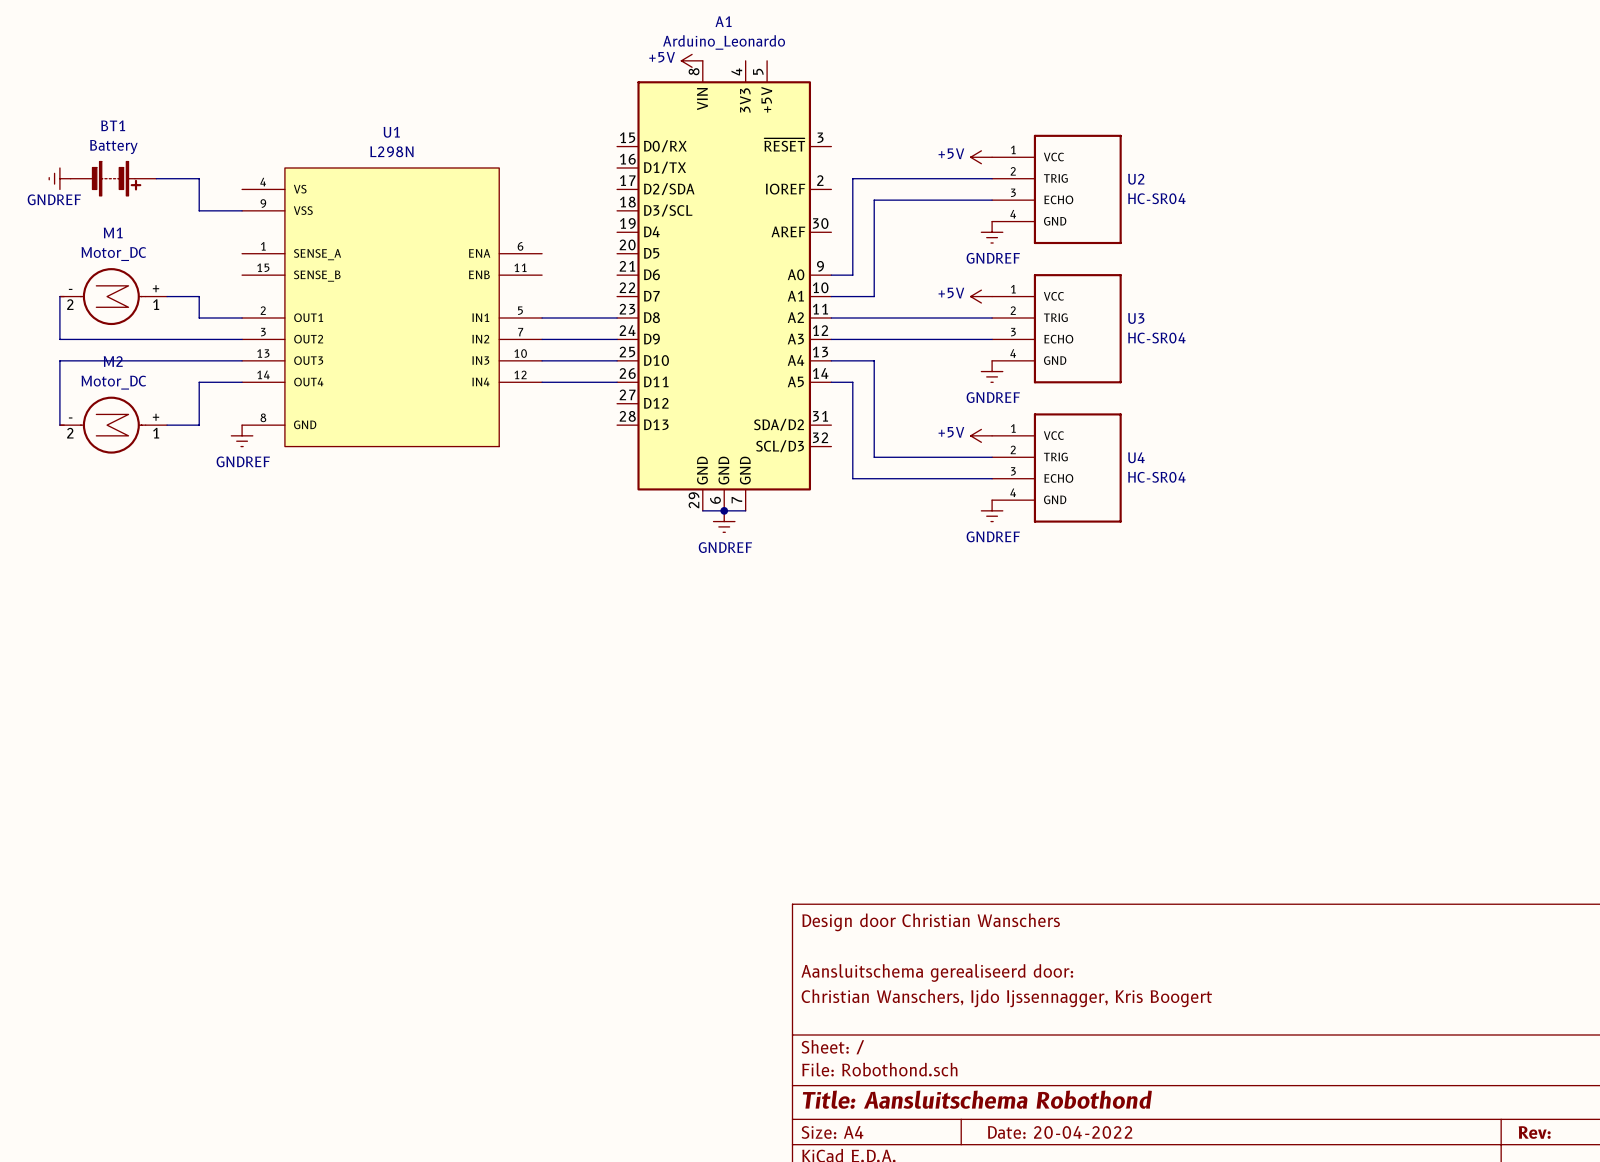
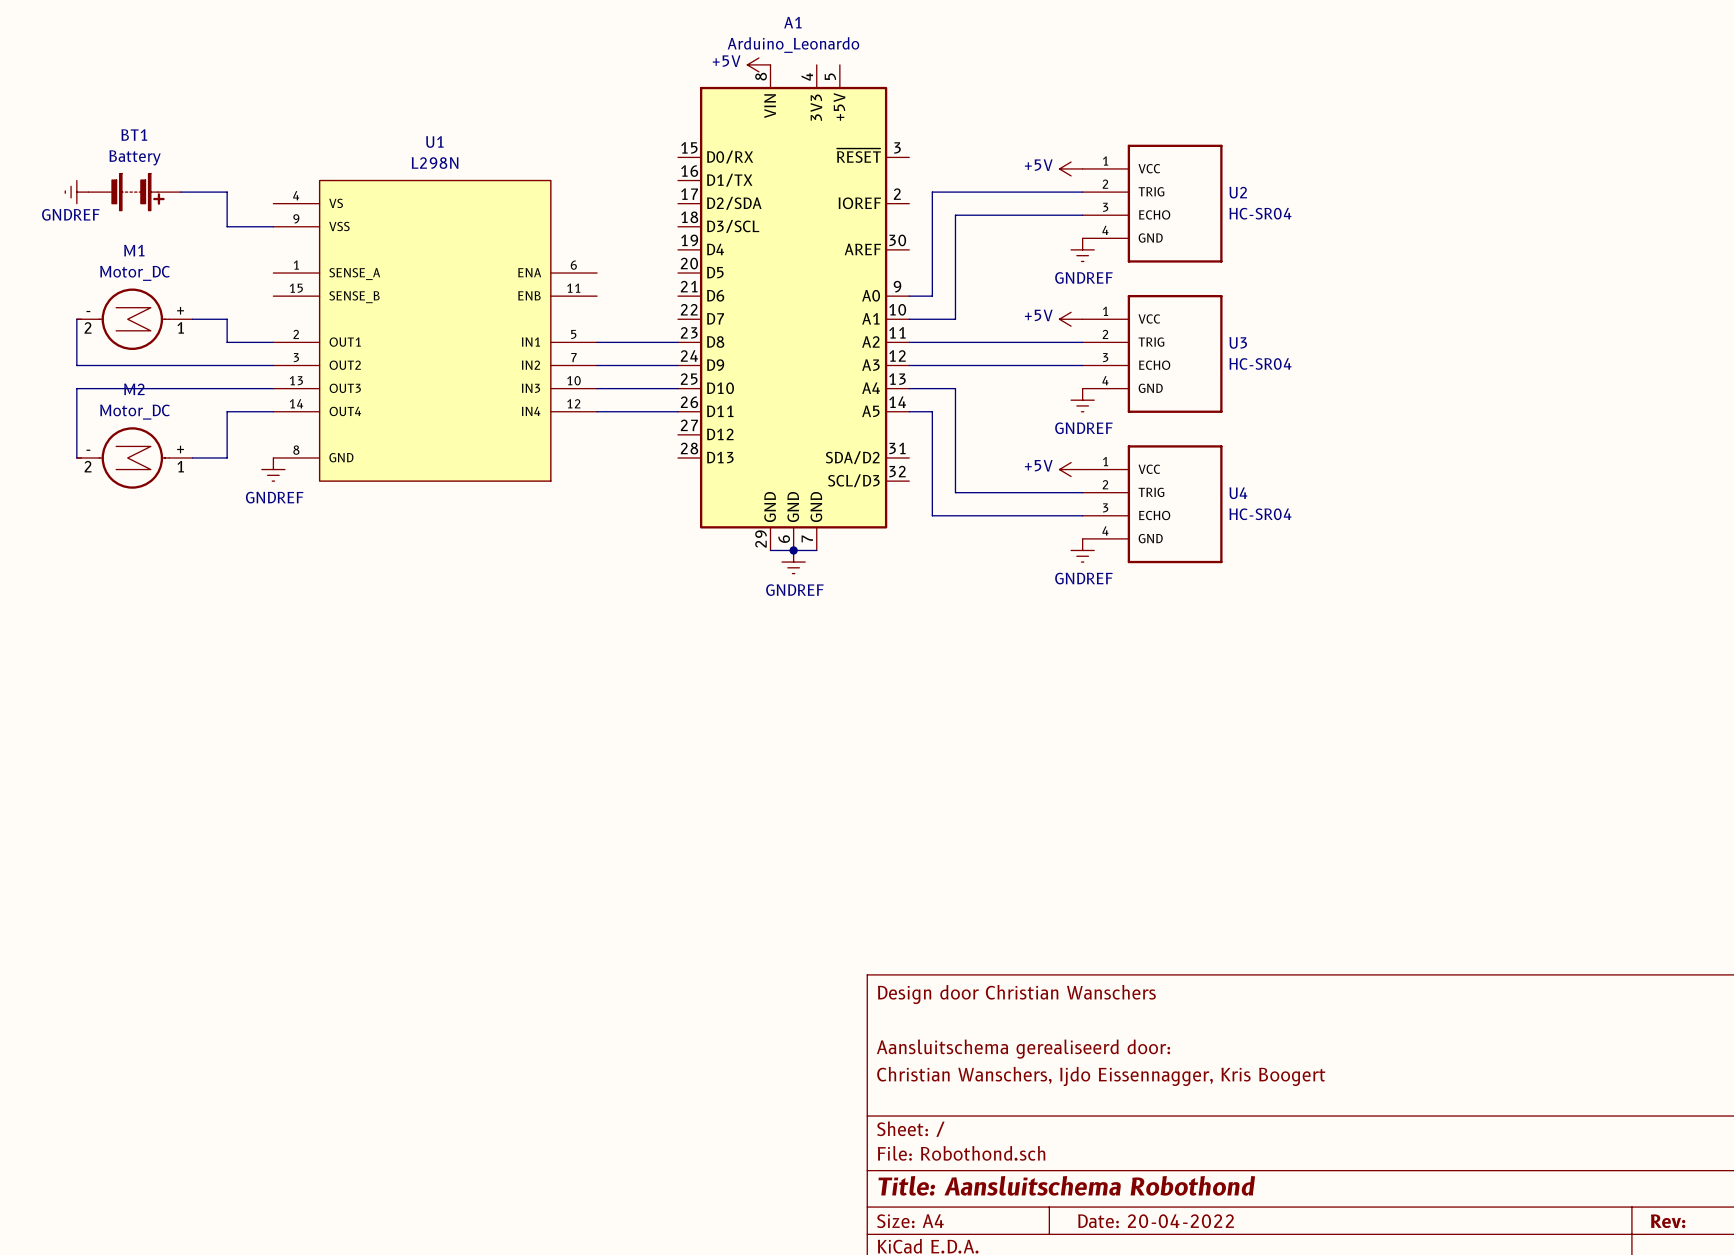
title block: Christian Wanschers, Ijdo Ijssennagger, Kris Boogert (1006, 998) -> Christian Wanschers, Ijdo Eissennagger, Kris Boogert (1101, 1076)

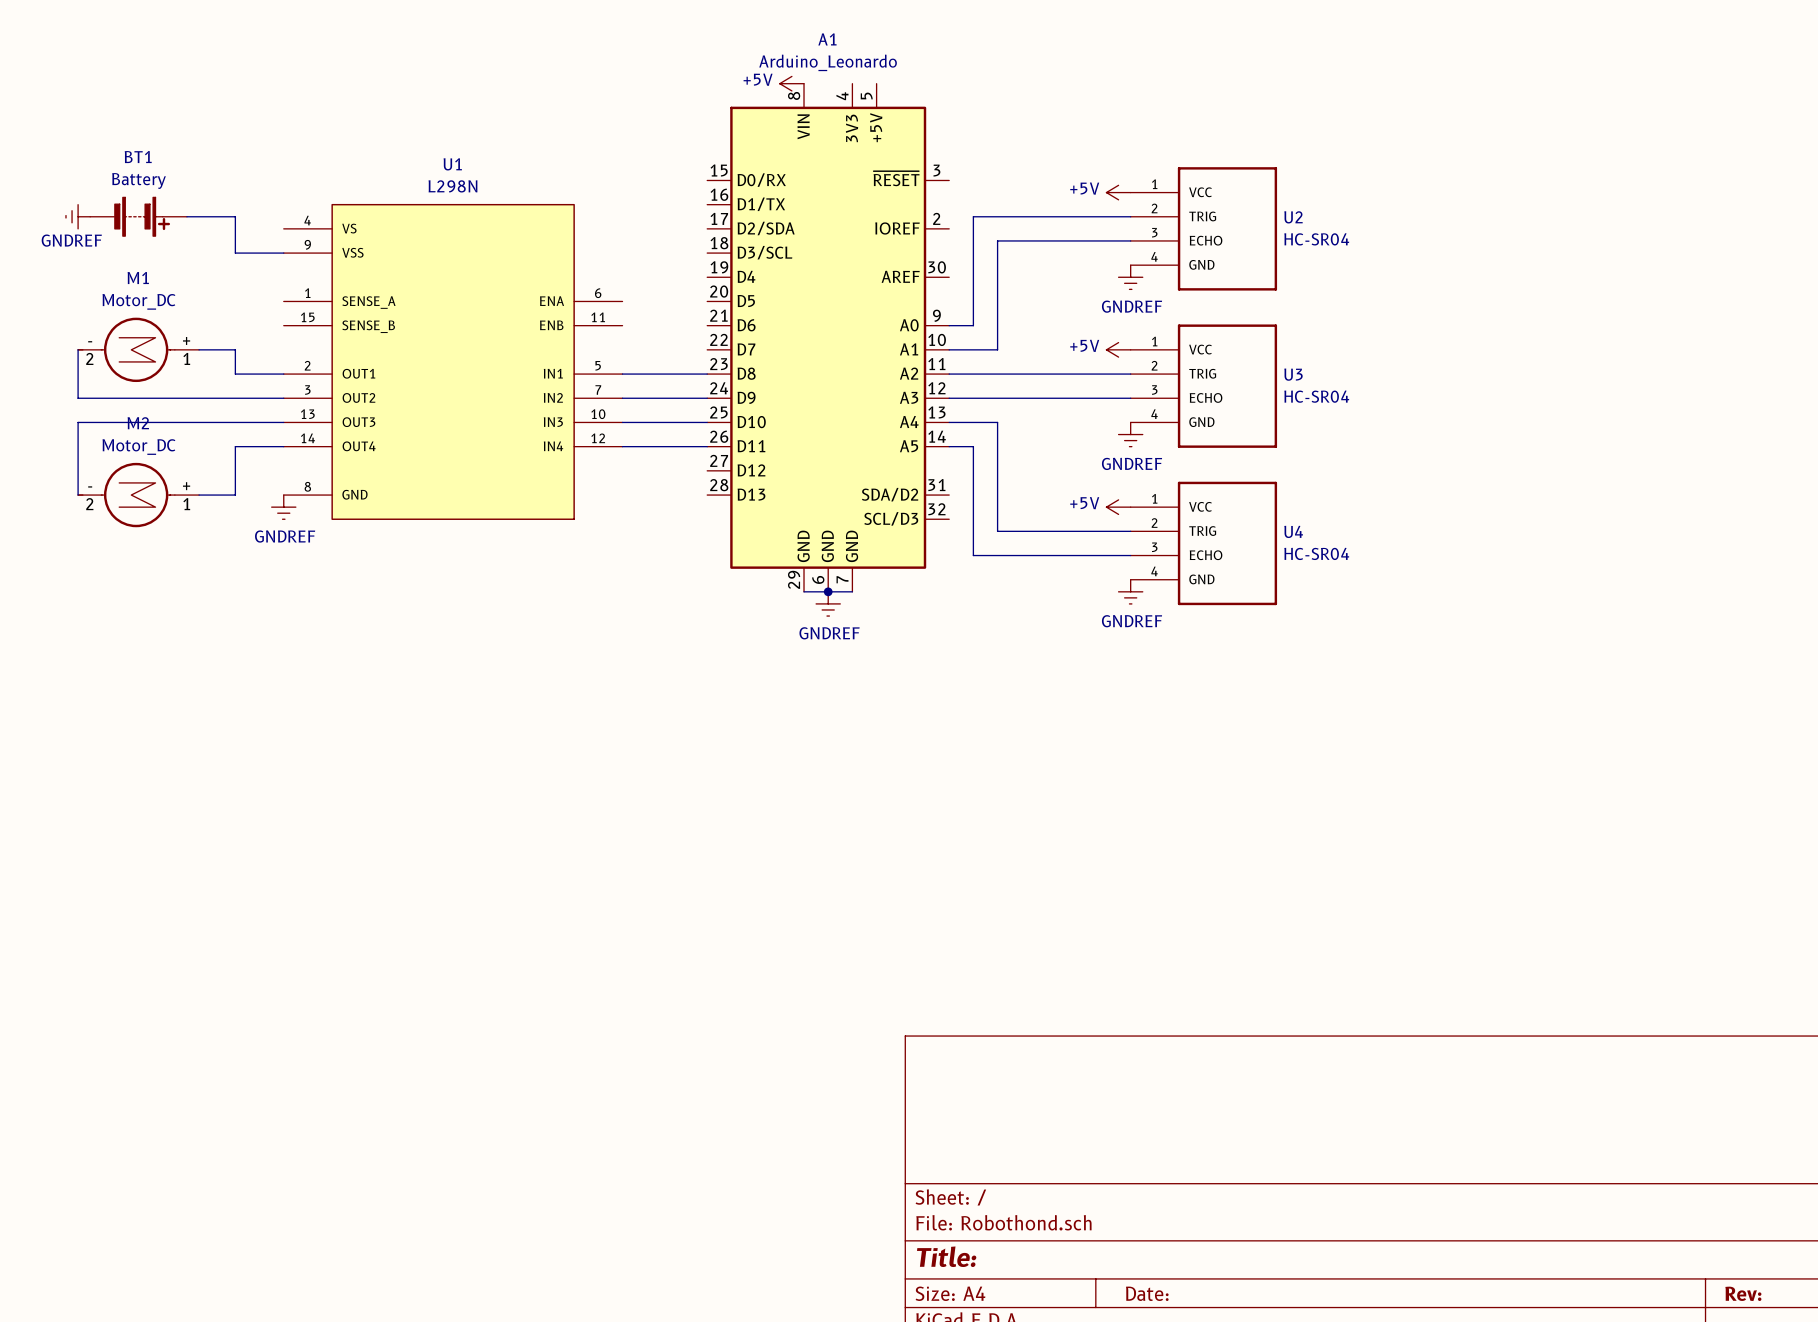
title block: Design door Christian Wanschers (1016, 994) -> none
title block: Aansluitschema gerealiseerd door: (1023, 1049) -> none
title block: Christian Wanschers, Ijdo Eissennagger, Kris Boogert (1101, 1076) -> none
title block: Title: Aansluitschema Robothond (1066, 1185) -> Title: (946, 1256)
title block: Date: 20-04-2022 (1156, 1221) -> Date: (1147, 1293)

